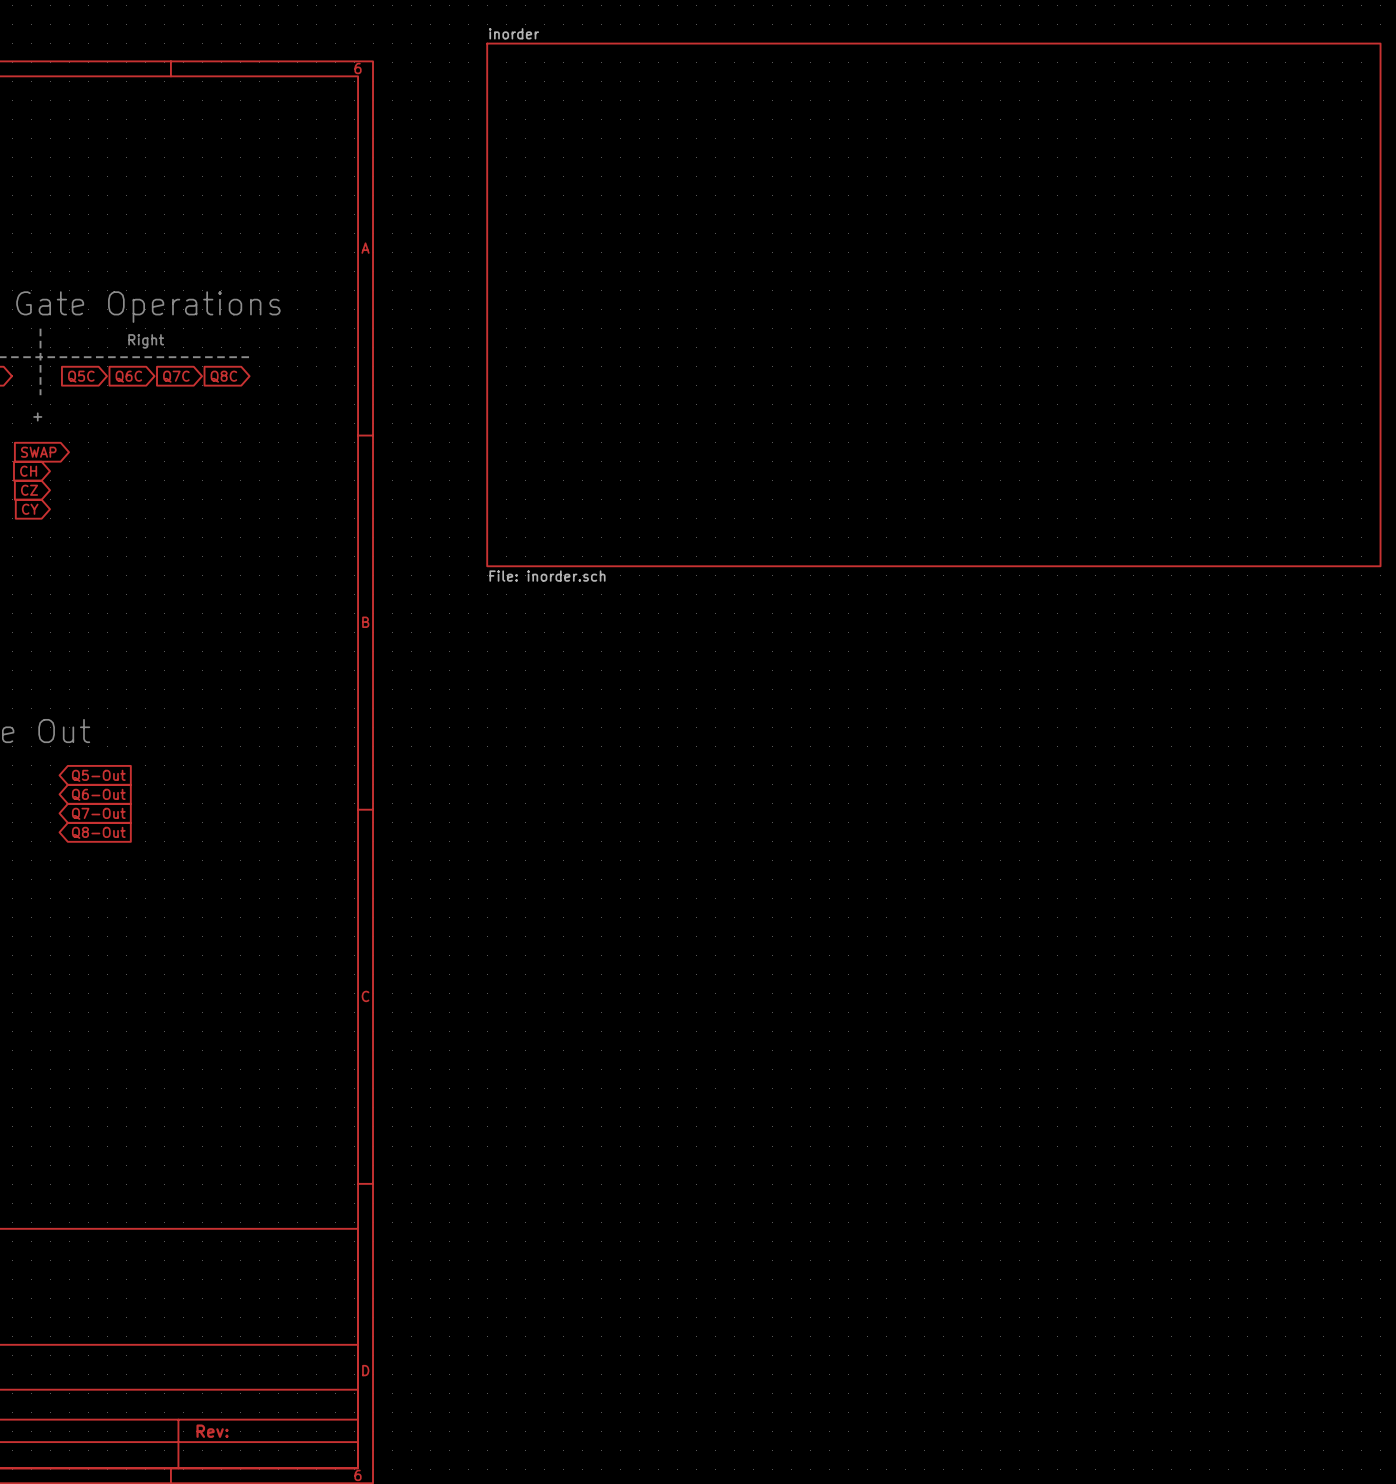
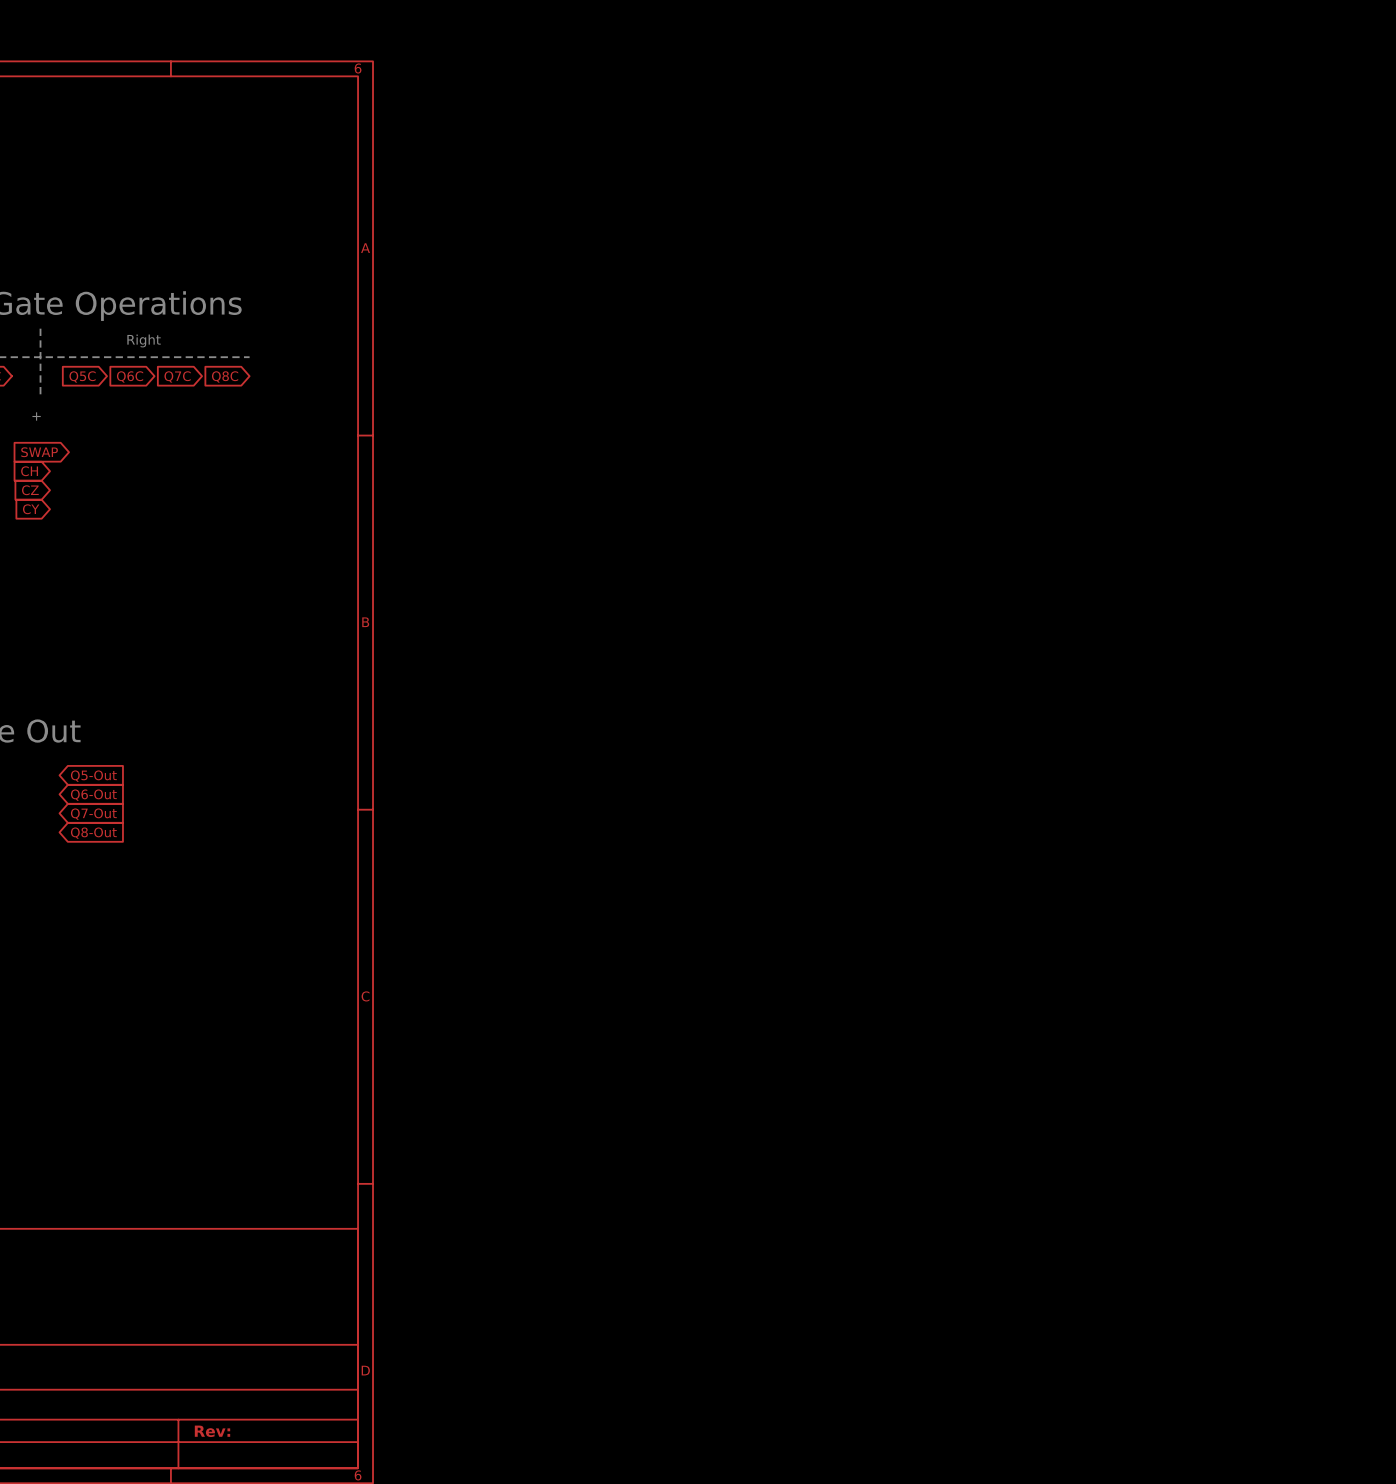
sheet inorder: File: inorder.sch (933, 304) -> none

